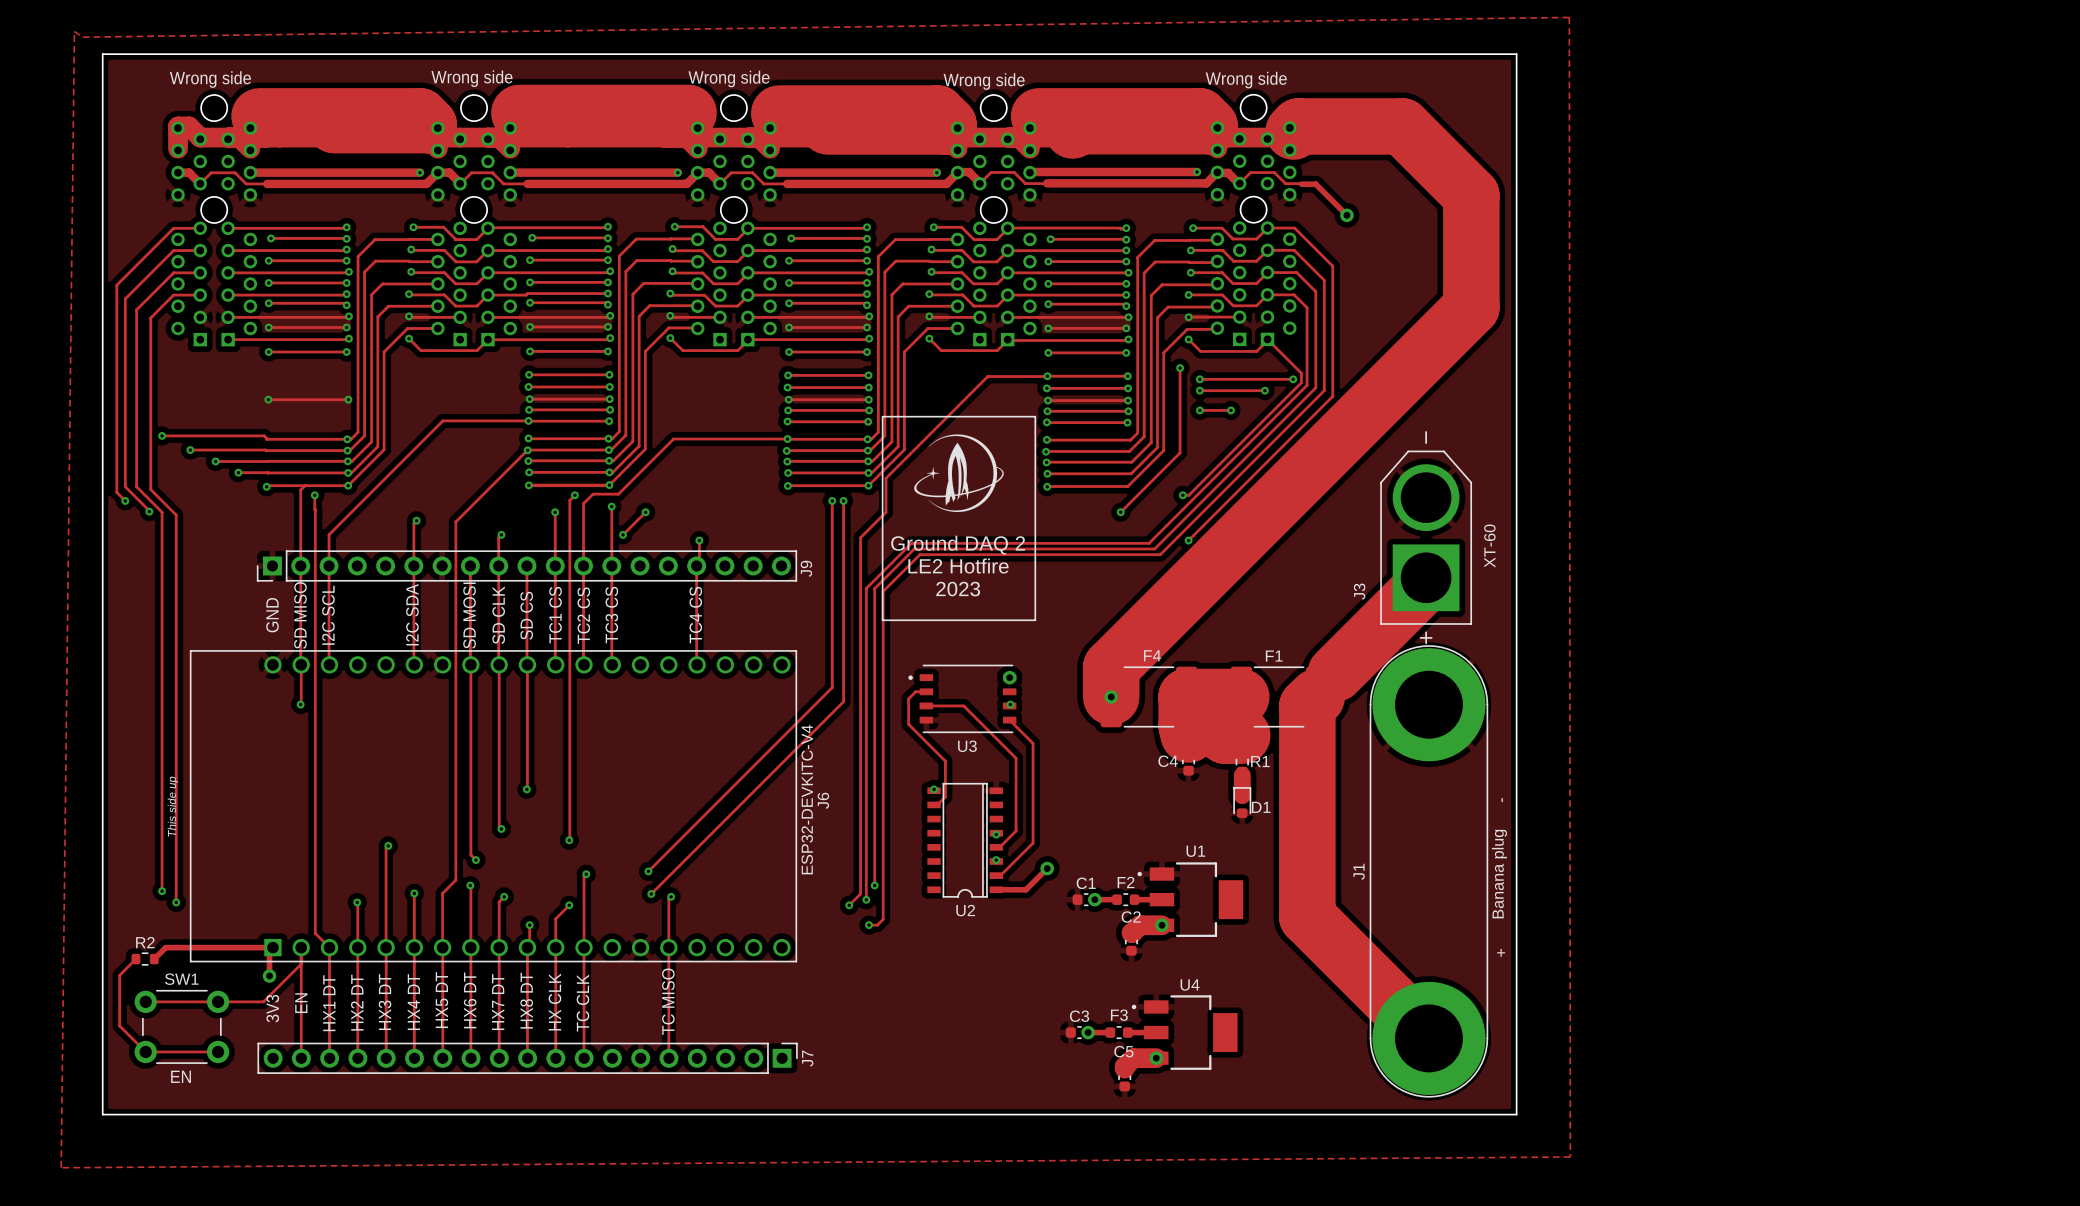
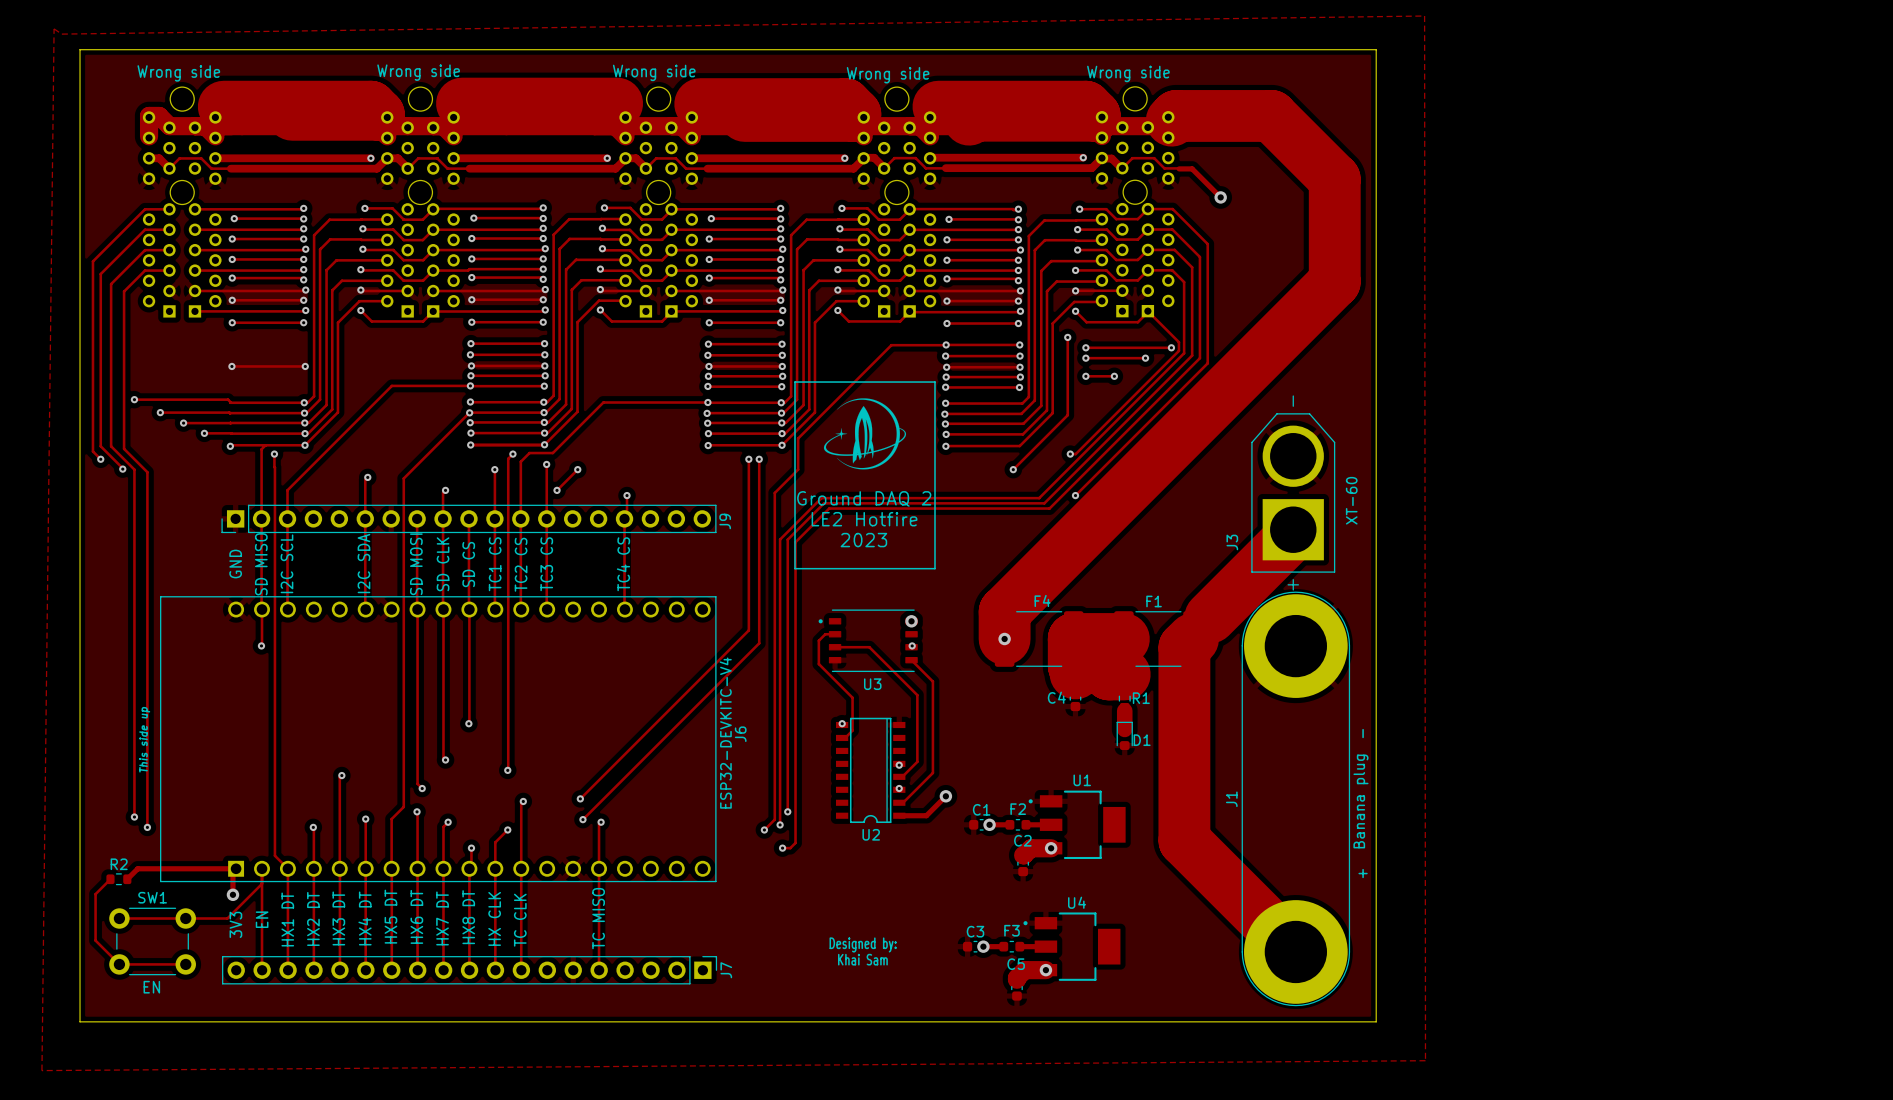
text: none -> Designed by: (863, 944)
text: none -> Khai Sam (862, 959)

